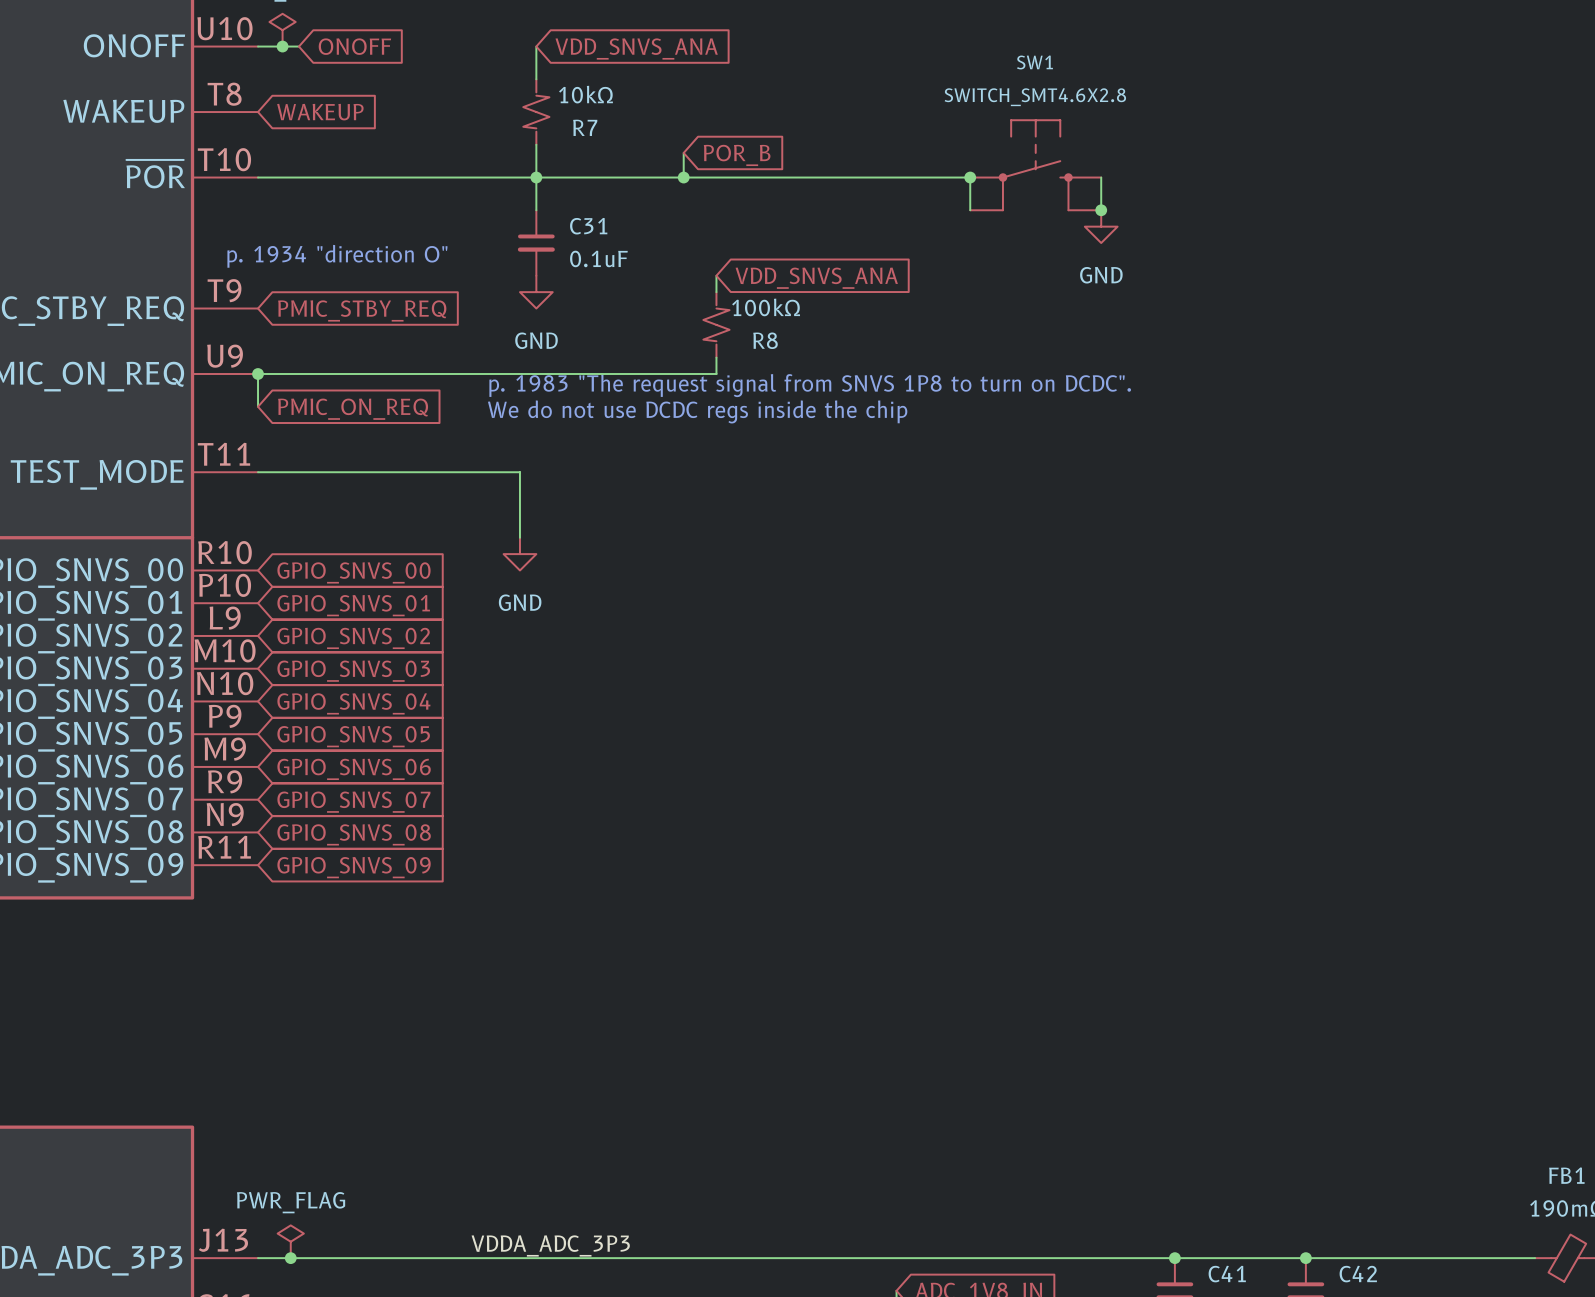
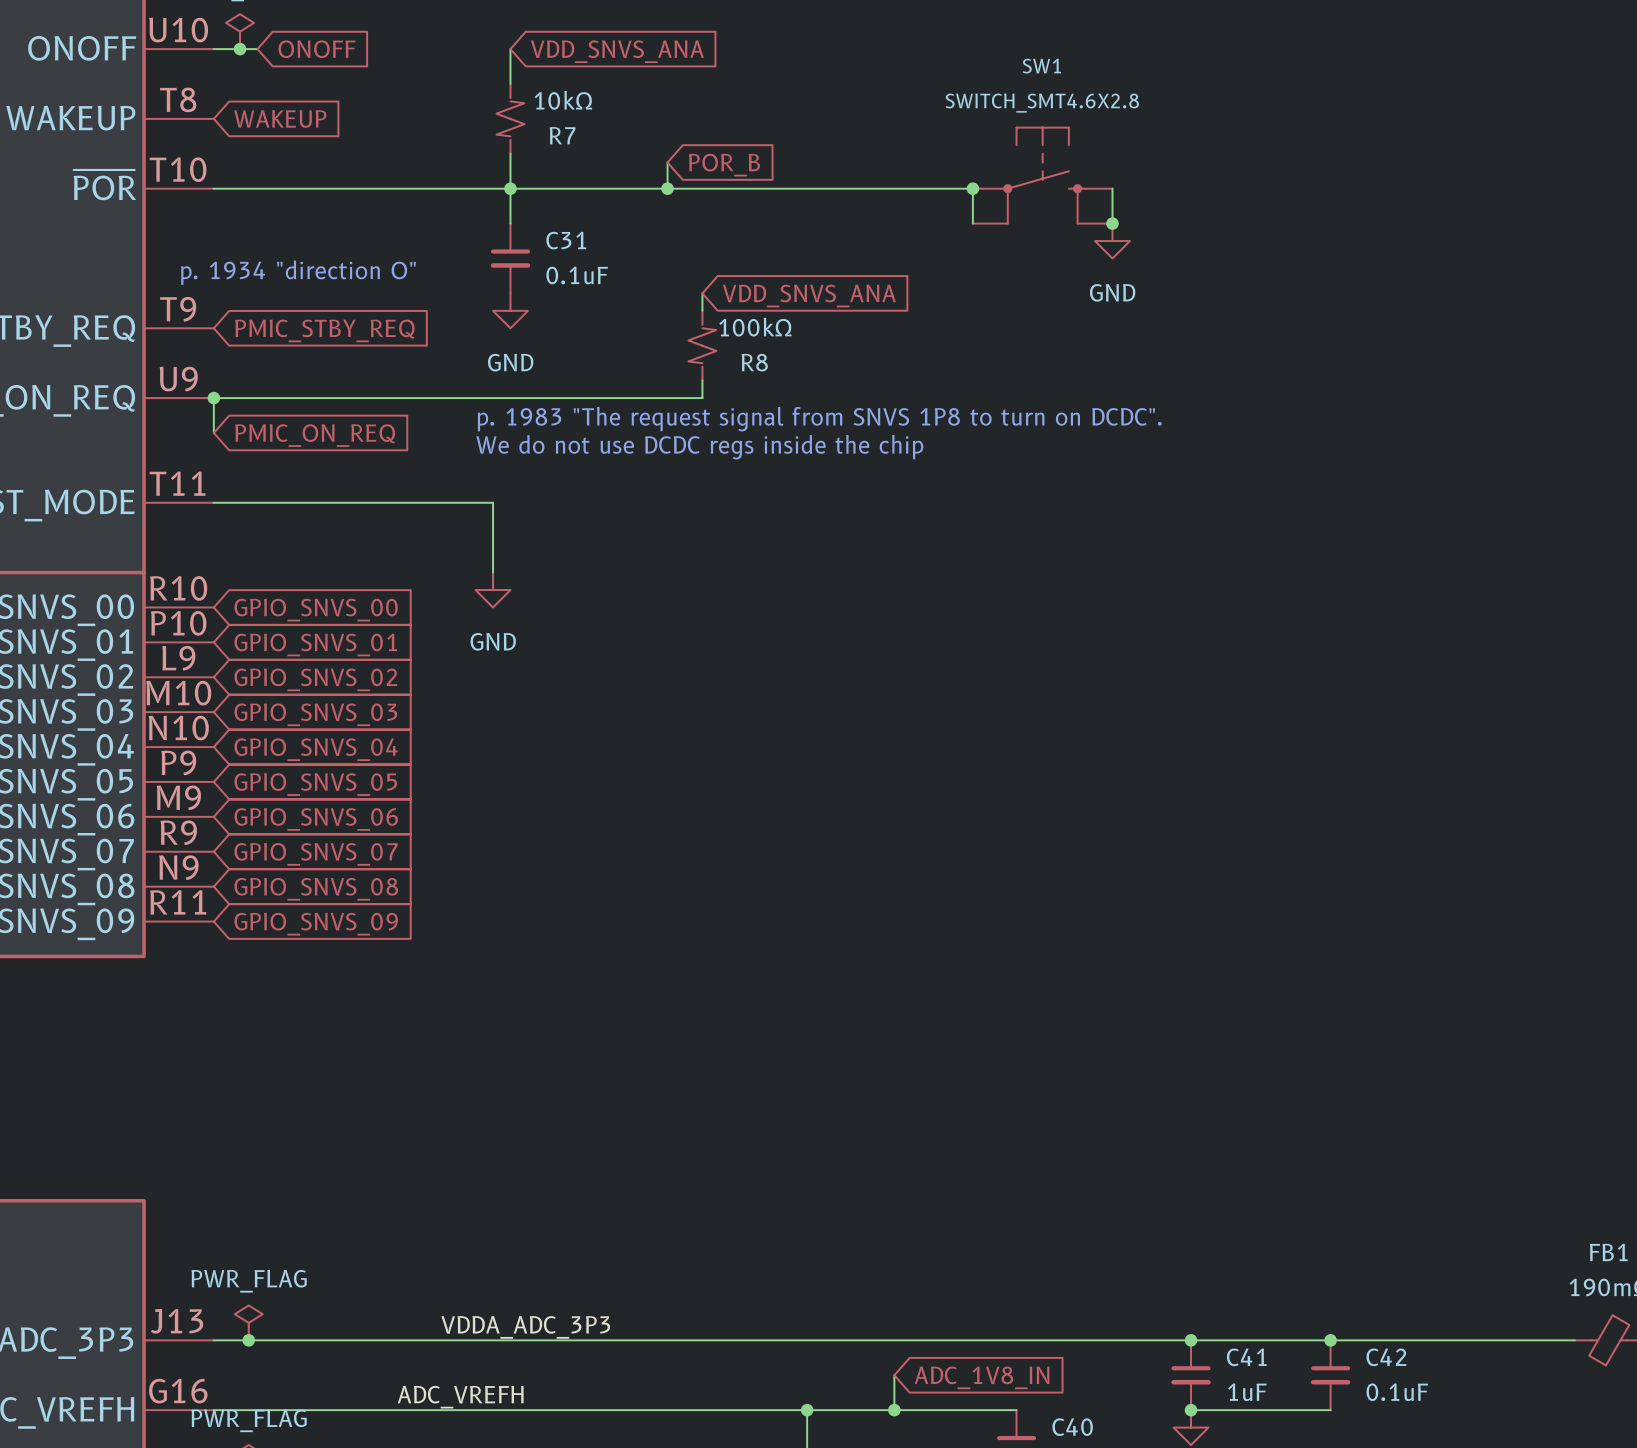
text position: p. 1983 "The request signal from SNVS 1P8 to turn on DCDC". (810, 385) -> p. 1983 "The request signal from SNVS 1P8 to turn on DCDC". (819, 419)
text position: We do not use DCDC regs inside the chip (697, 411) -> We do not use DCDC regs inside the chip (699, 447)

